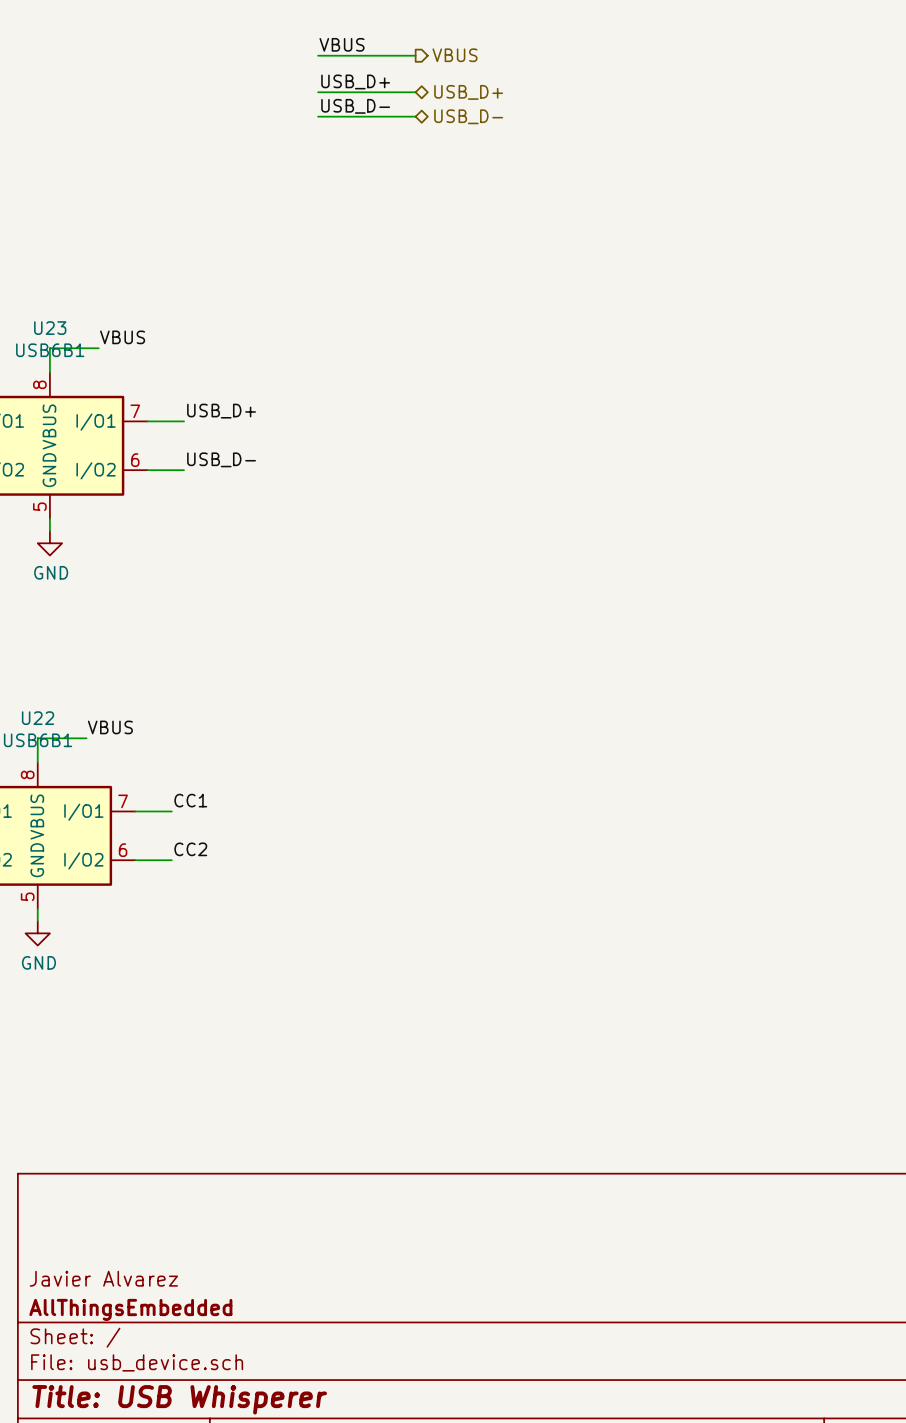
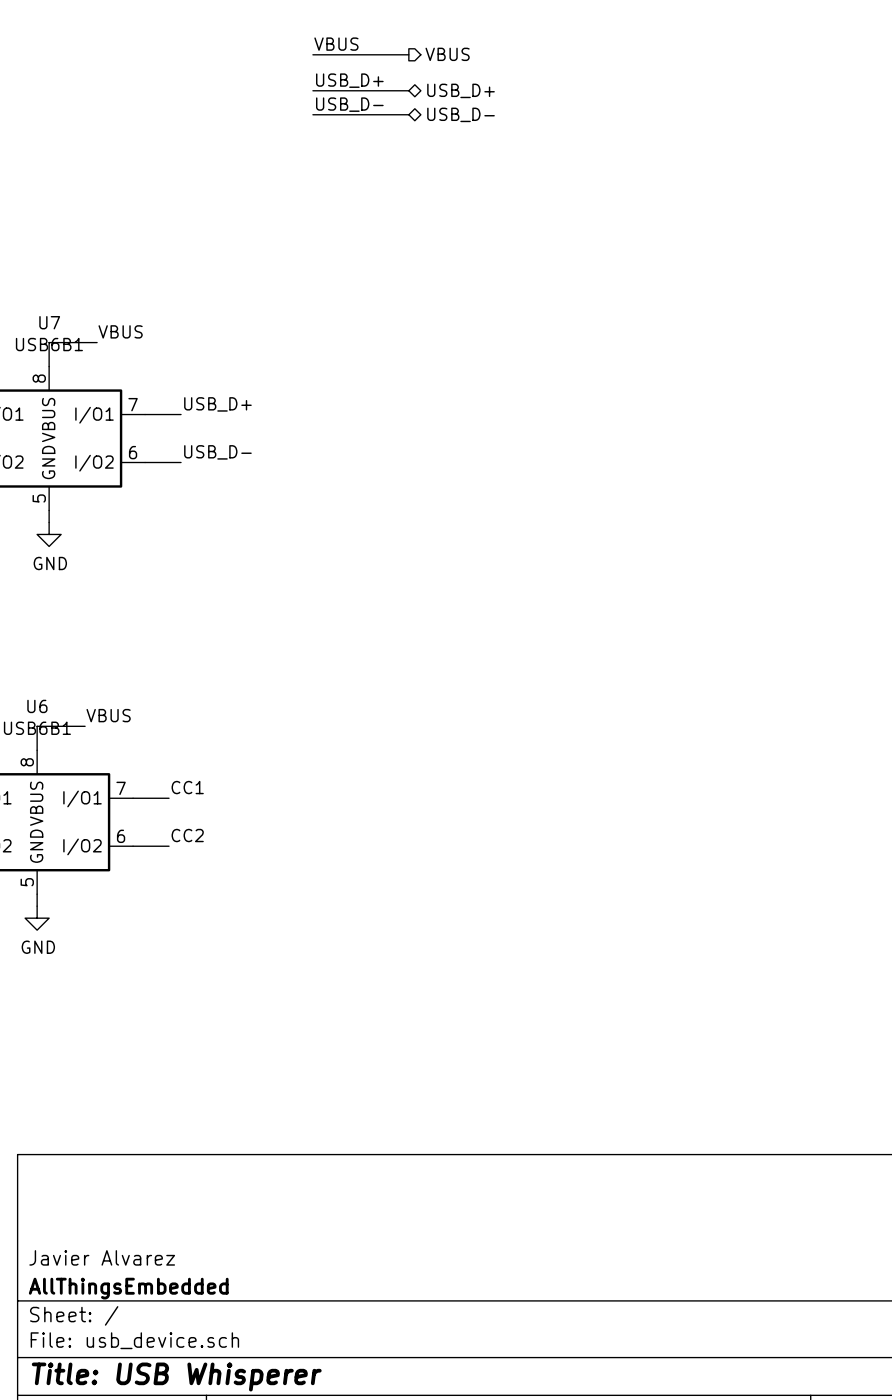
U23 name: U23 (50, 328) -> U7 (49, 322)
U22 name: U22 (38, 718) -> U6 (37, 706)

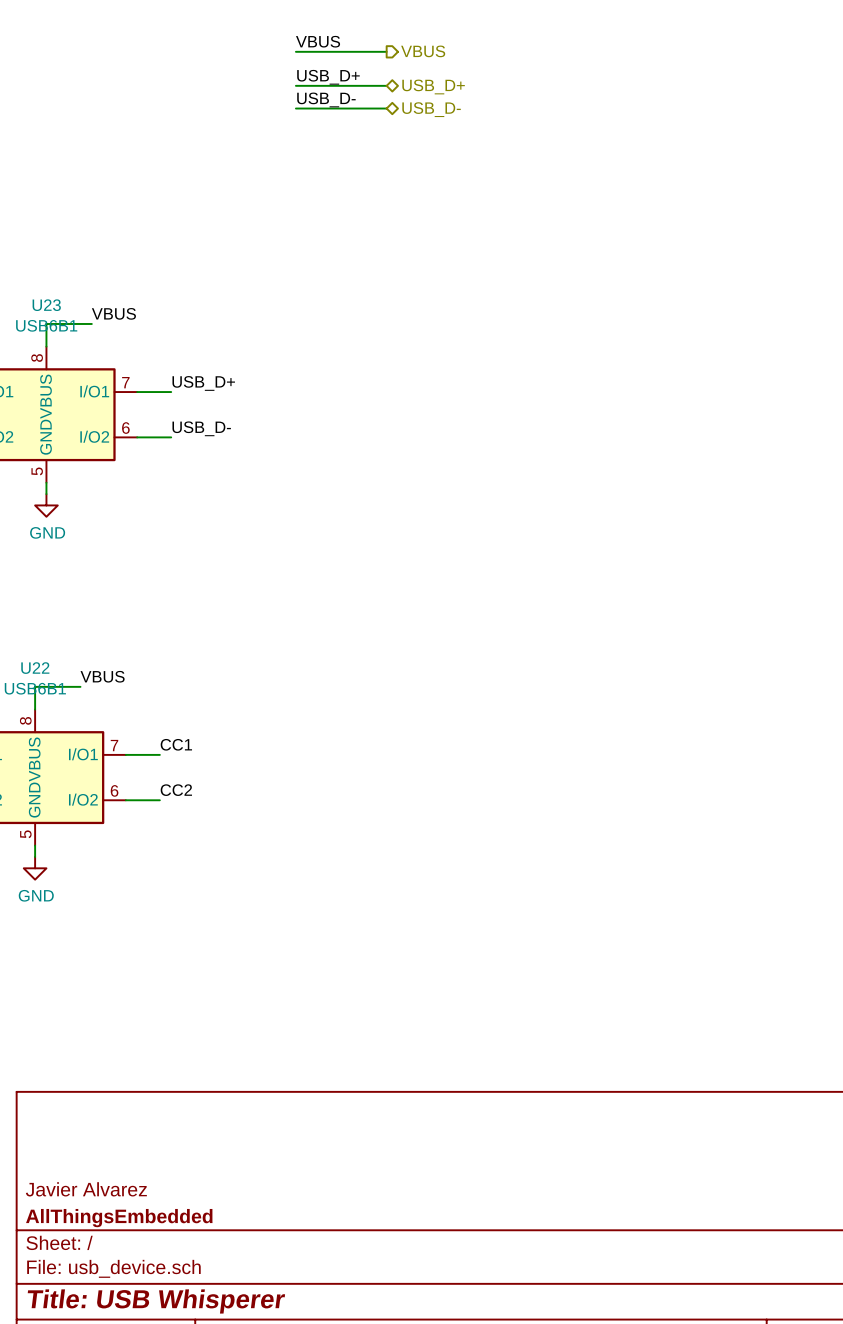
U7 name: U7 (49, 322) -> U23 (46, 305)
U6 name: U6 (37, 706) -> U22 (35, 668)

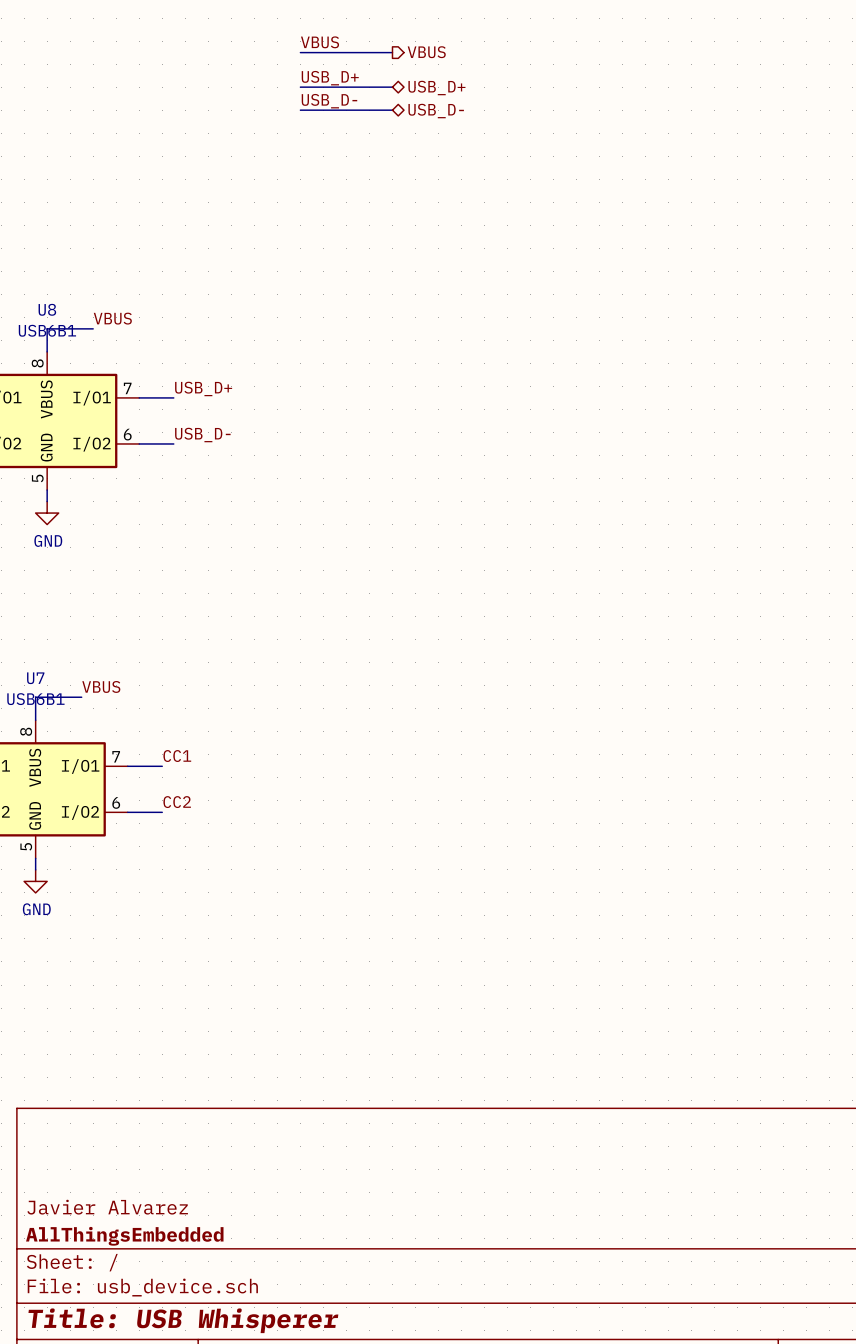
U23 name: U23 (46, 305) -> U8 (47, 309)
U22 name: U22 (35, 668) -> U7 (35, 678)

